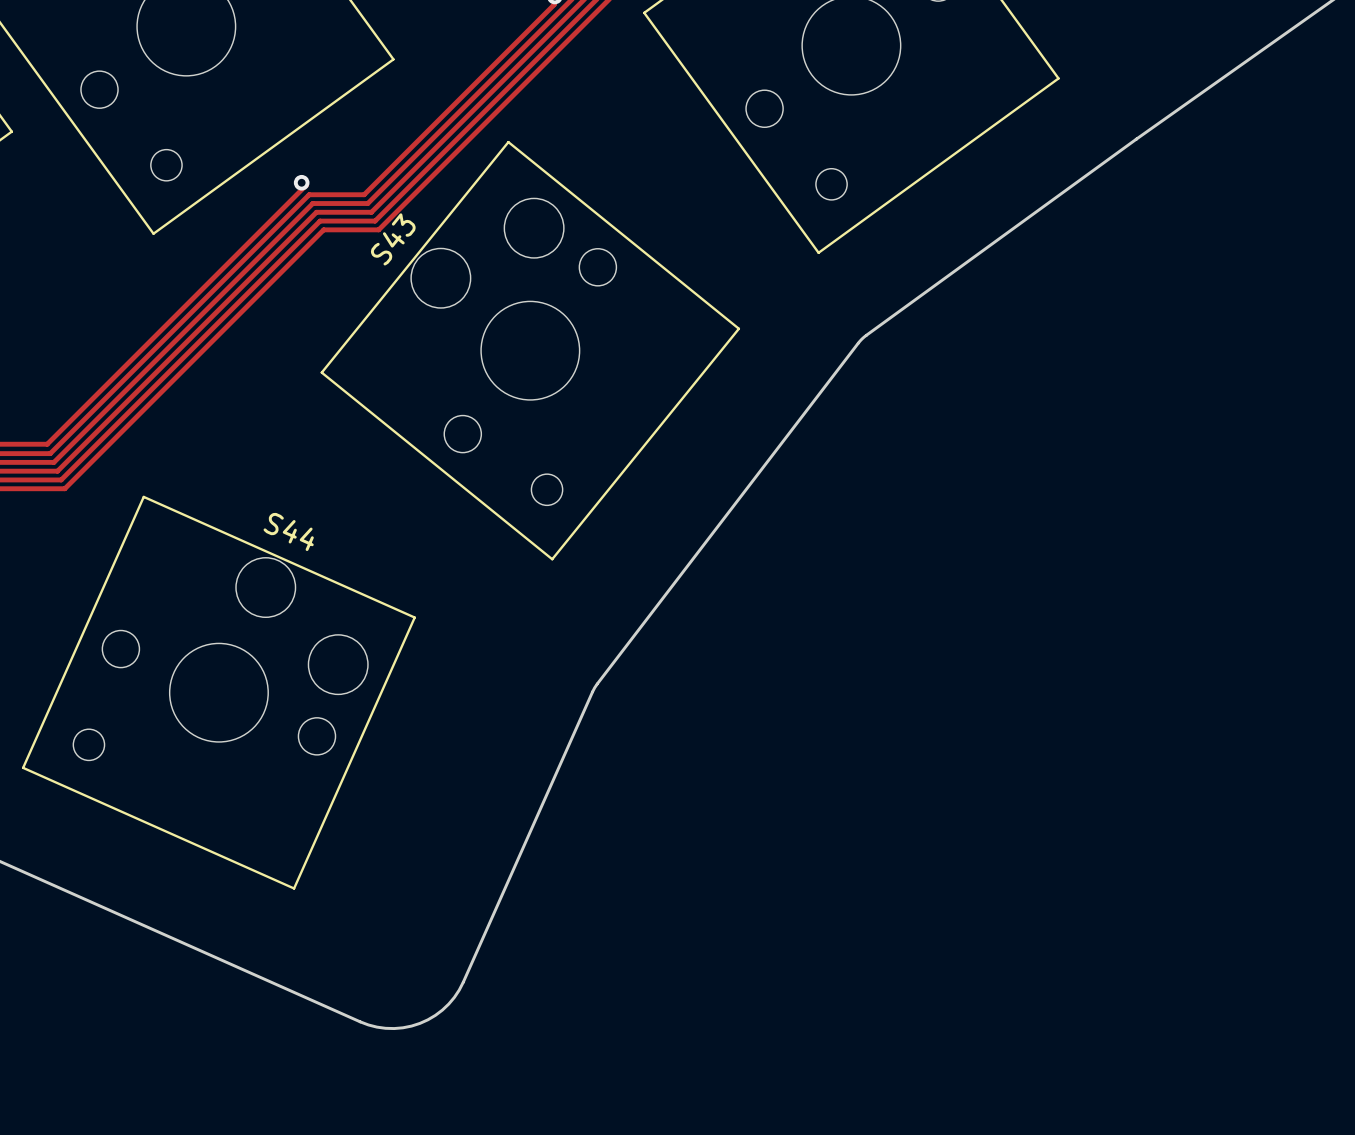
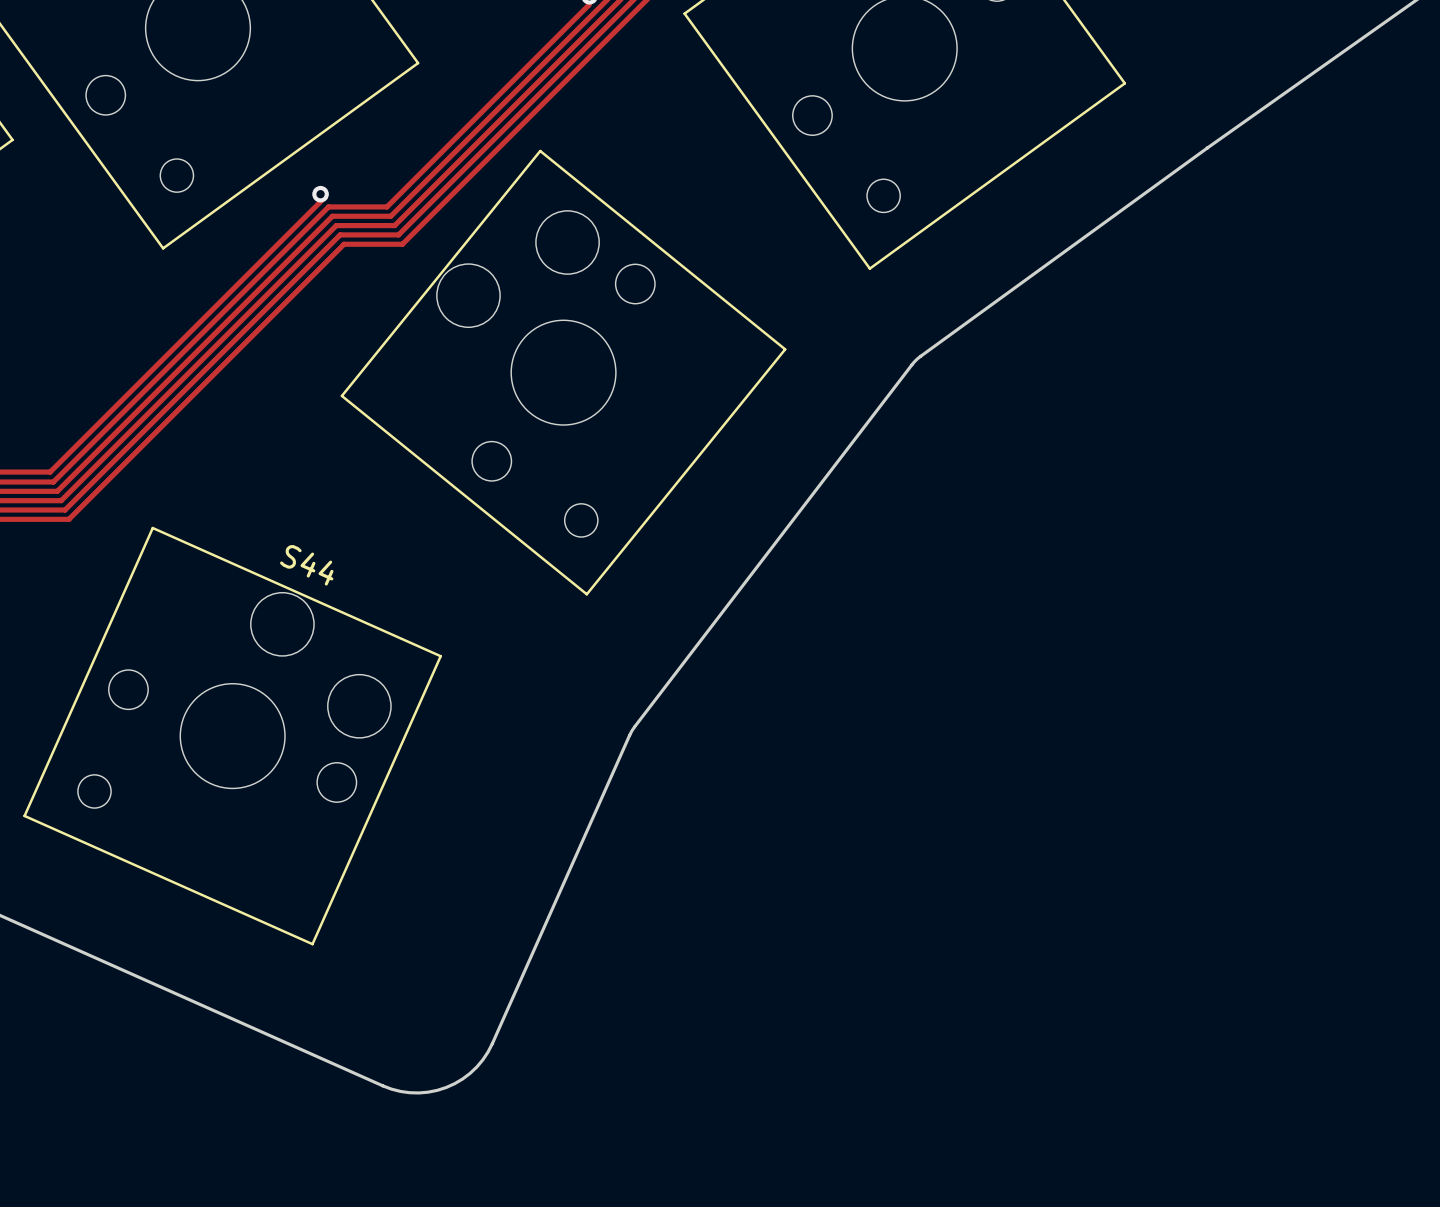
S43 name: S43 (393, 239) -> none

